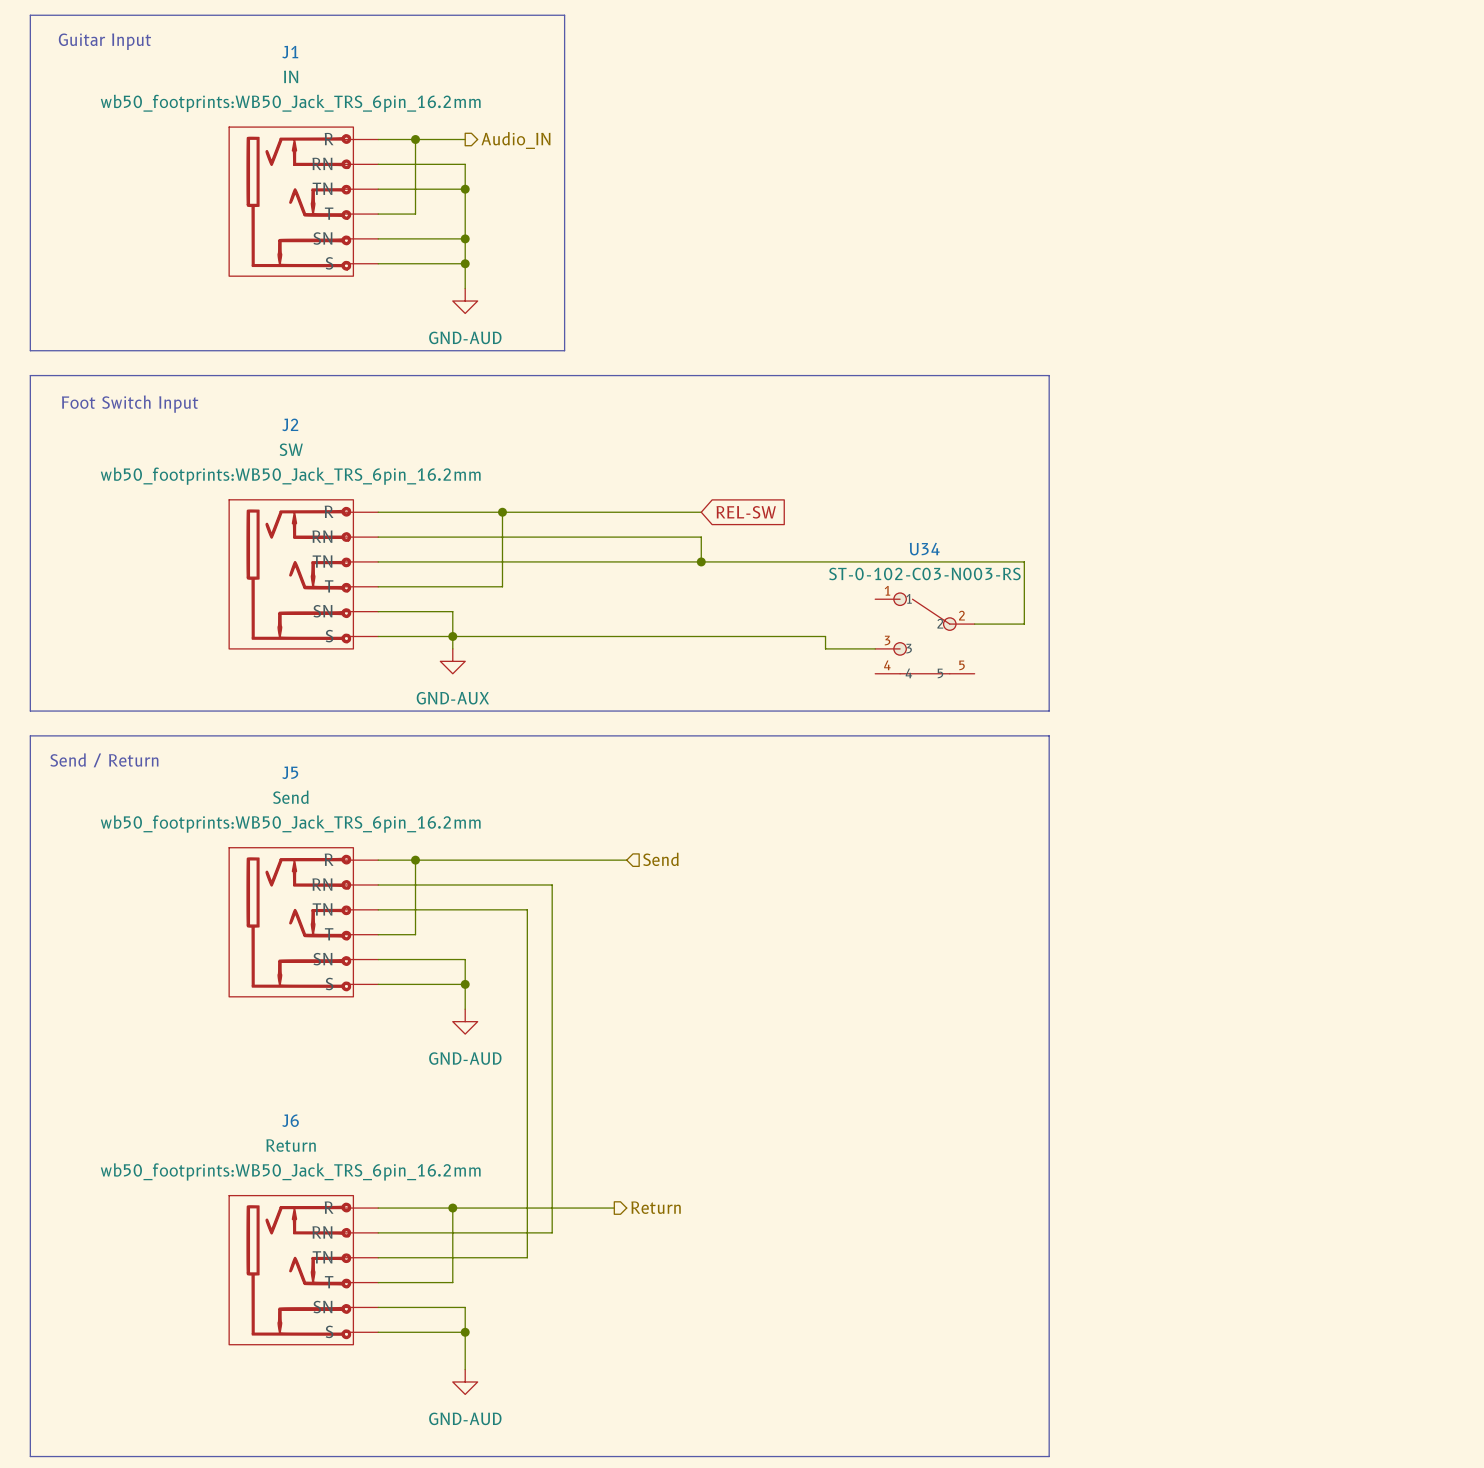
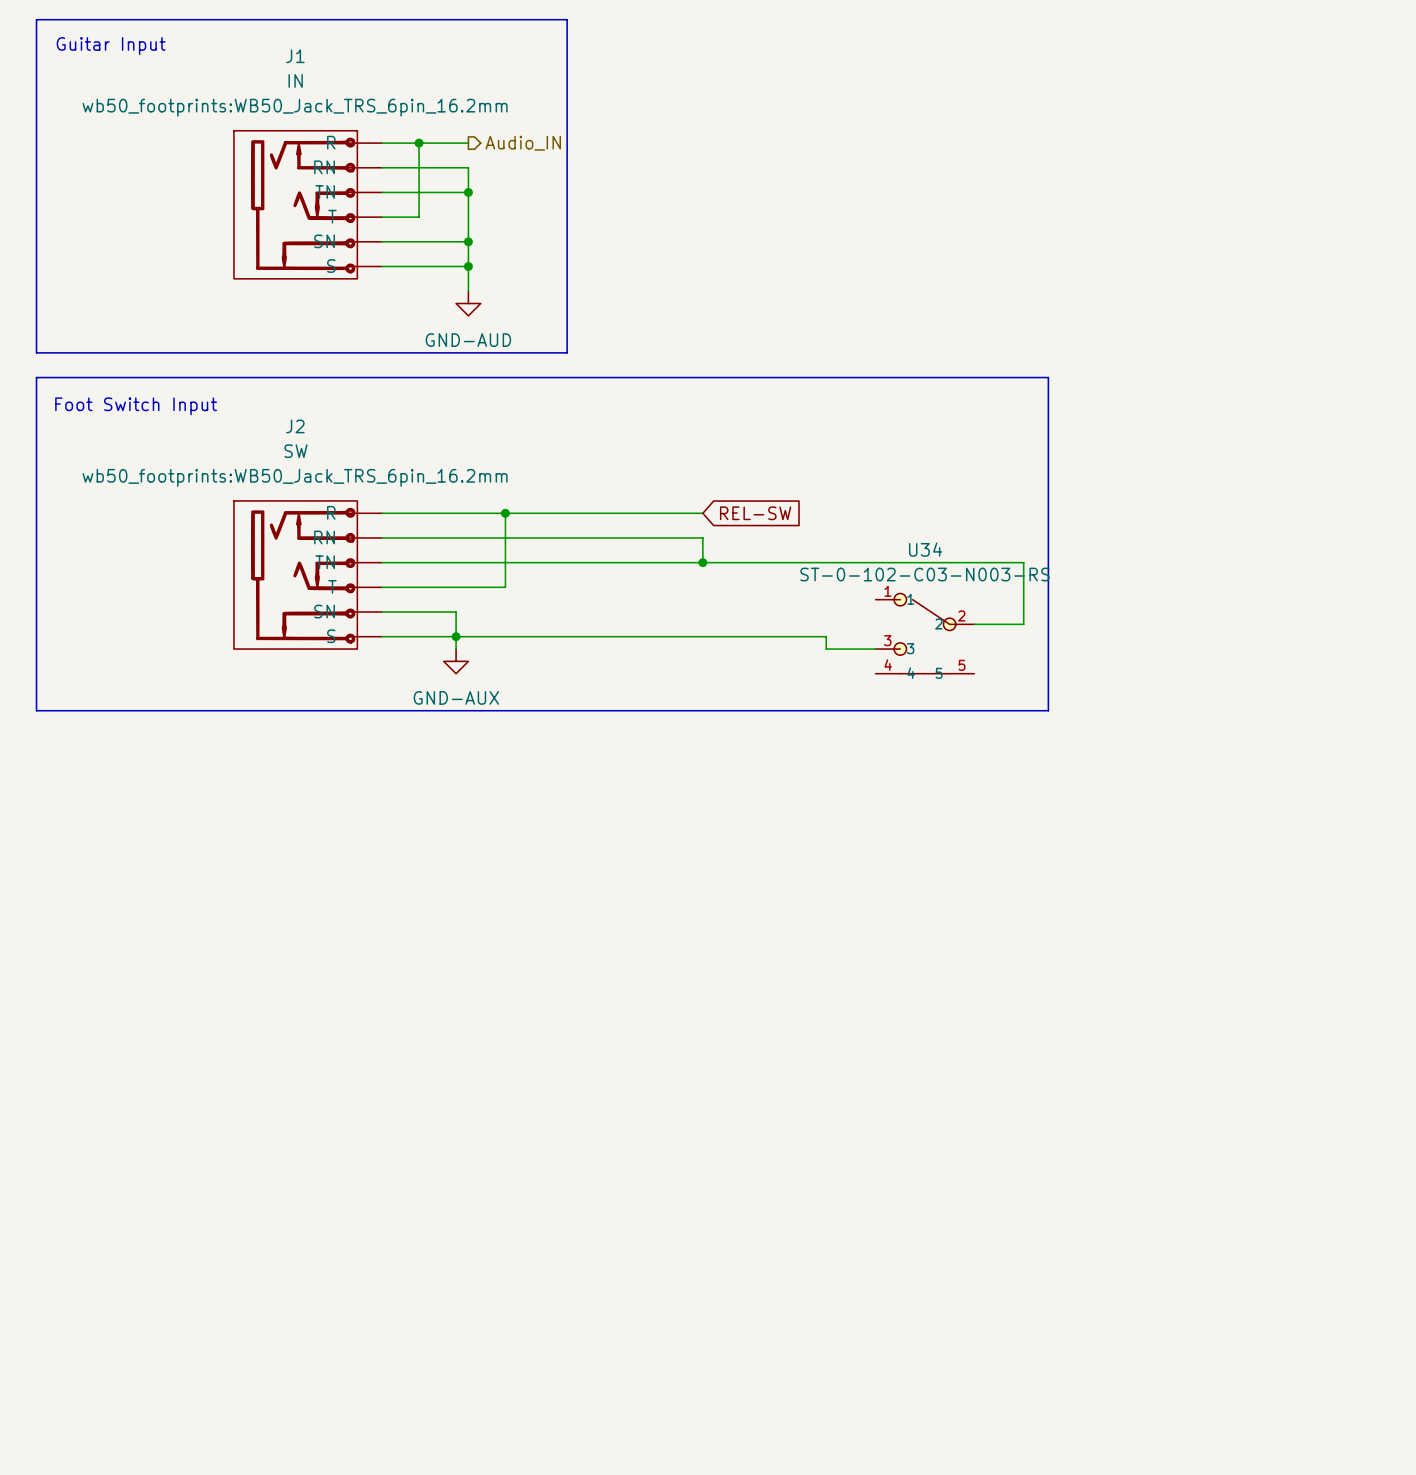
line: (30, 735) (1049, 735) (1049, 1456) (30, 1456) (30, 735) -> none
text: Send / Return (104, 760) -> none
hierarchical label: Send (660, 859) -> none
wire: (378, 860) (626, 860) -> none
wire: (415, 860) (415, 934) (378, 934) -> none
junction: (415, 860) -> none
wire: (378, 884) (552, 884) (552, 1232) (378, 1232) -> none
wire: (378, 909) (527, 909) (527, 1257) (378, 1257) -> none
J5: Send (303, 922) -> none
wire: (378, 959) (465, 959) (465, 1009) -> none
wire: (378, 984) (465, 984) -> none
junction: (465, 984) -> none
power symbol: GND-AUD (465, 1021) -> none
hierarchical label: Return (656, 1207) -> none
wire: (378, 1208) (614, 1208) -> none
wire: (452, 1208) (452, 1282) (378, 1282) -> none
junction: (452, 1208) -> none
J6: Return (303, 1270) -> none
wire: (378, 1307) (465, 1307) (465, 1369) -> none
wire: (378, 1332) (465, 1332) -> none
junction: (465, 1332) -> none
power symbol: GND-AUD (465, 1381) -> none

